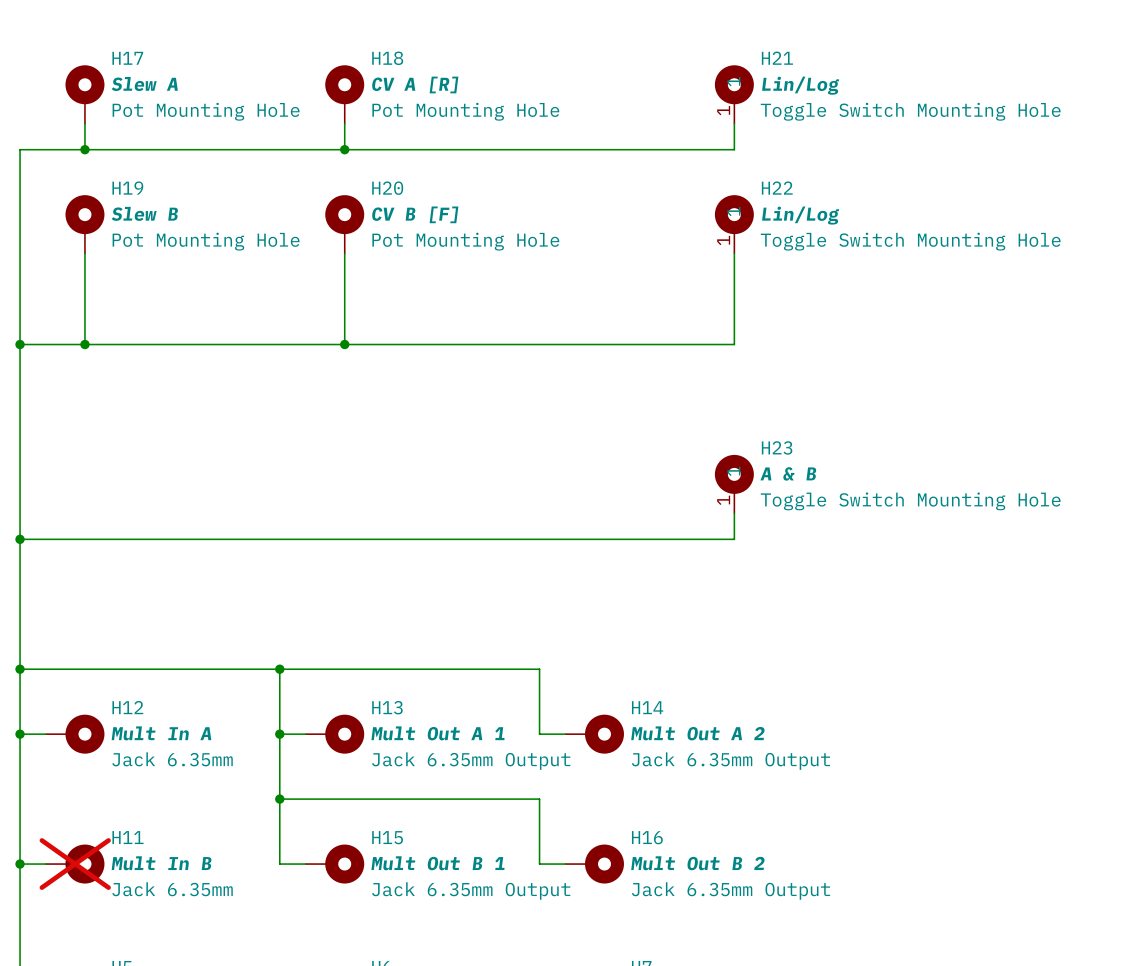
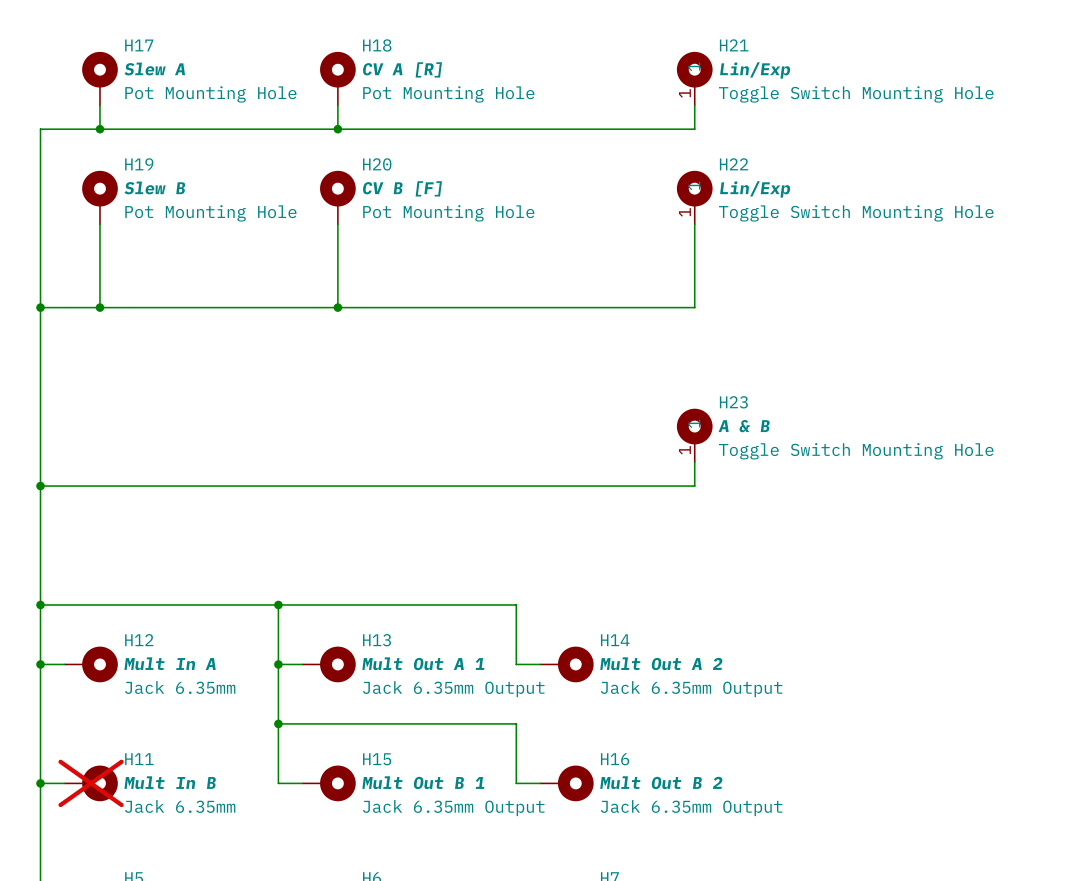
H21 value: Lin/Log (800, 85) -> Lin/Exp (755, 70)
H22 value: Lin/Log (800, 215) -> Lin/Exp (755, 189)

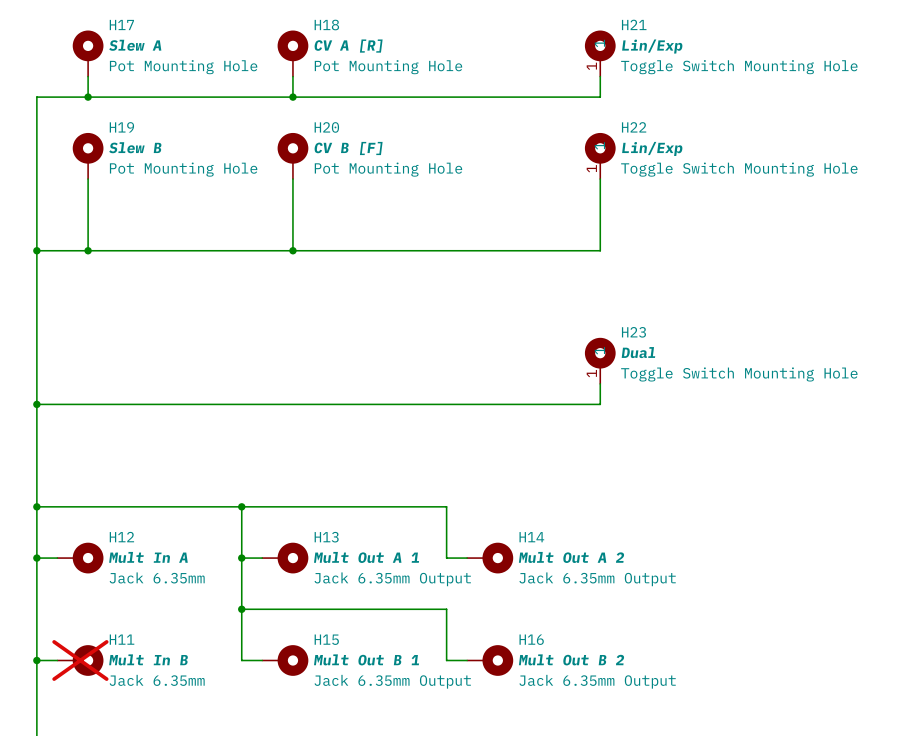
H23 value: A & B (744, 426) -> Dual (638, 352)

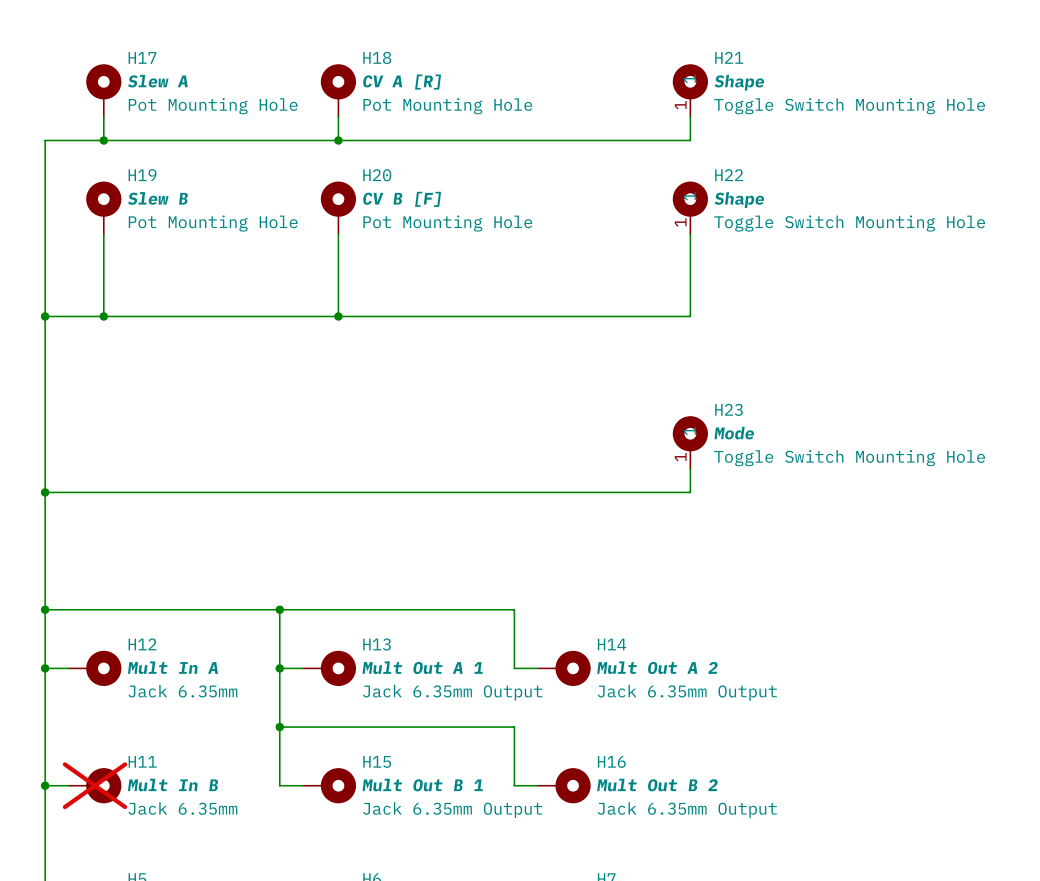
H21 value: Lin/Exp (652, 46) -> Shape (739, 82)
H22 value: Lin/Exp (652, 148) -> Shape (739, 200)
H23 value: Dual (638, 352) -> Mode (734, 433)

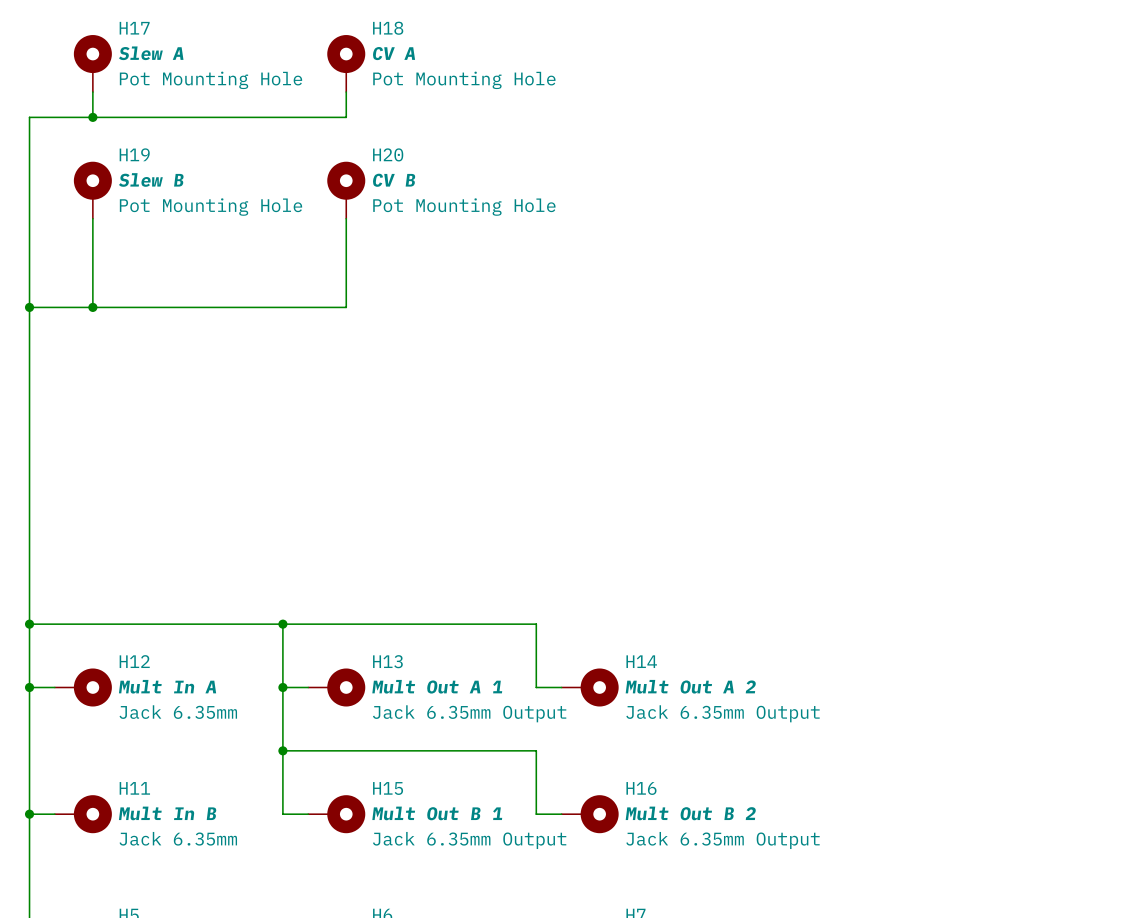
H18 value: CV A [R] (402, 82) -> CV A (393, 53)
H21: Shape (690, 90) -> none
wire: (690, 117) (690, 140) (338, 140) -> none
junction: (338, 140) -> none
H20 value: CV B [F] (402, 199) -> CV B (394, 180)
H22: Shape (690, 207) -> none
wire: (690, 234) (690, 316) (338, 316) -> none
junction: (338, 316) -> none
H23: Mode (690, 442) -> none
wire: (690, 468) (690, 492) (45, 492) -> none
junction: (45, 492) -> none
H11 do-not-place cross: (95, 785) -> none

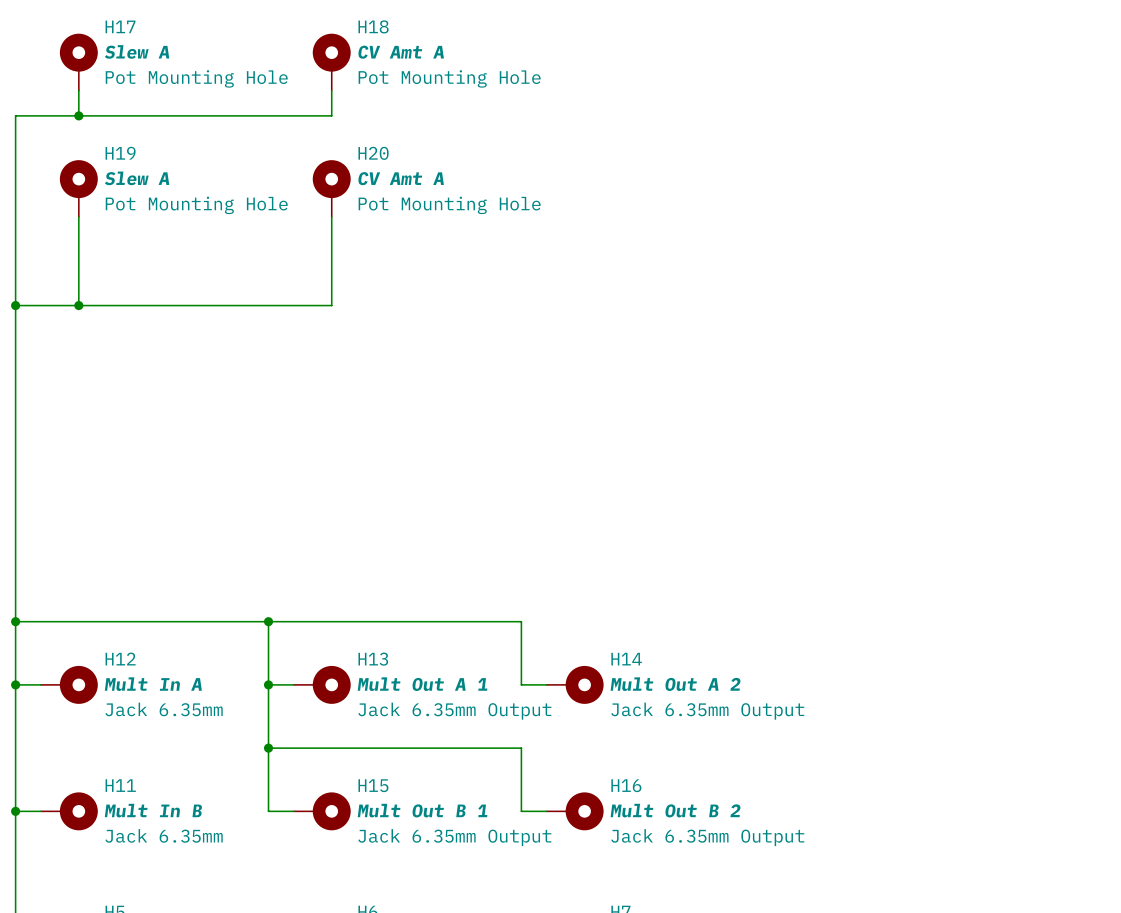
H18 value: CV A (393, 53) -> CV Amt A (401, 52)
H19 value: Slew B (151, 179) -> Slew A (137, 178)
H20 value: CV B (394, 180) -> CV Amt A (401, 178)

